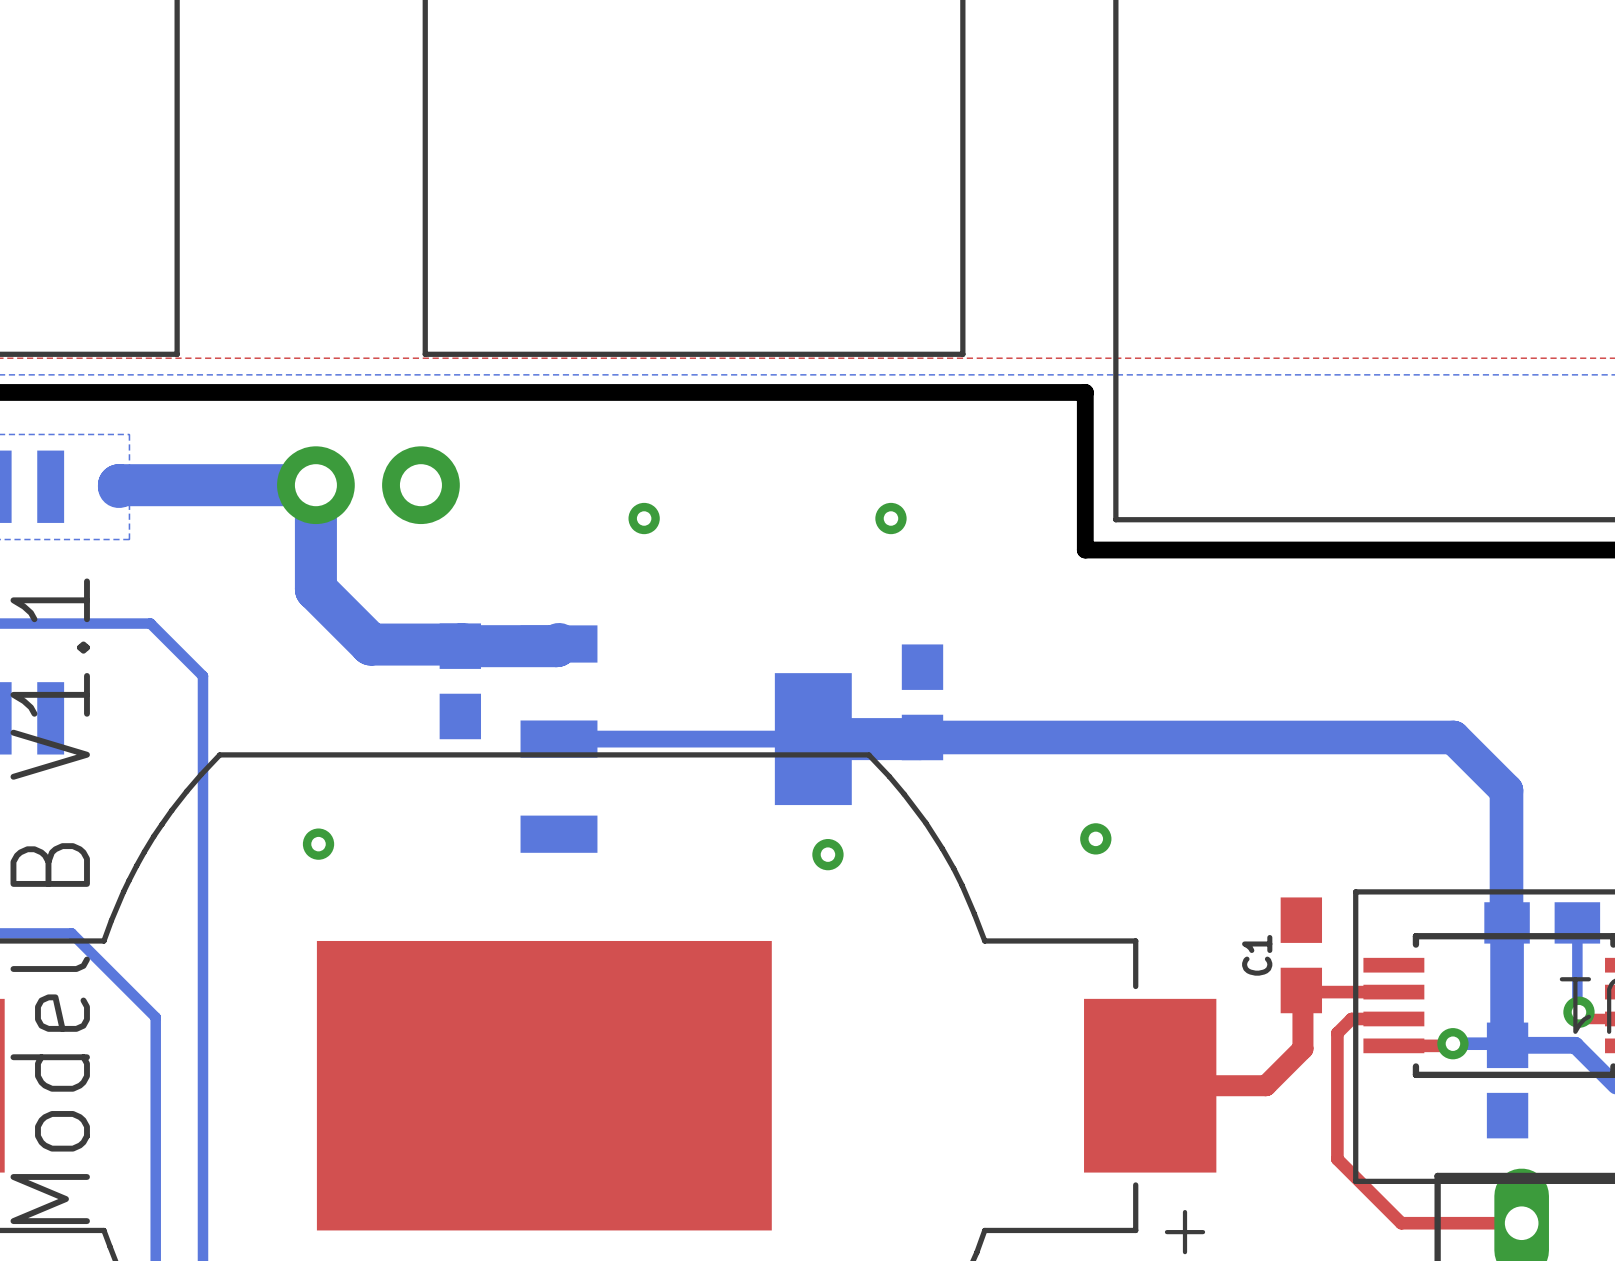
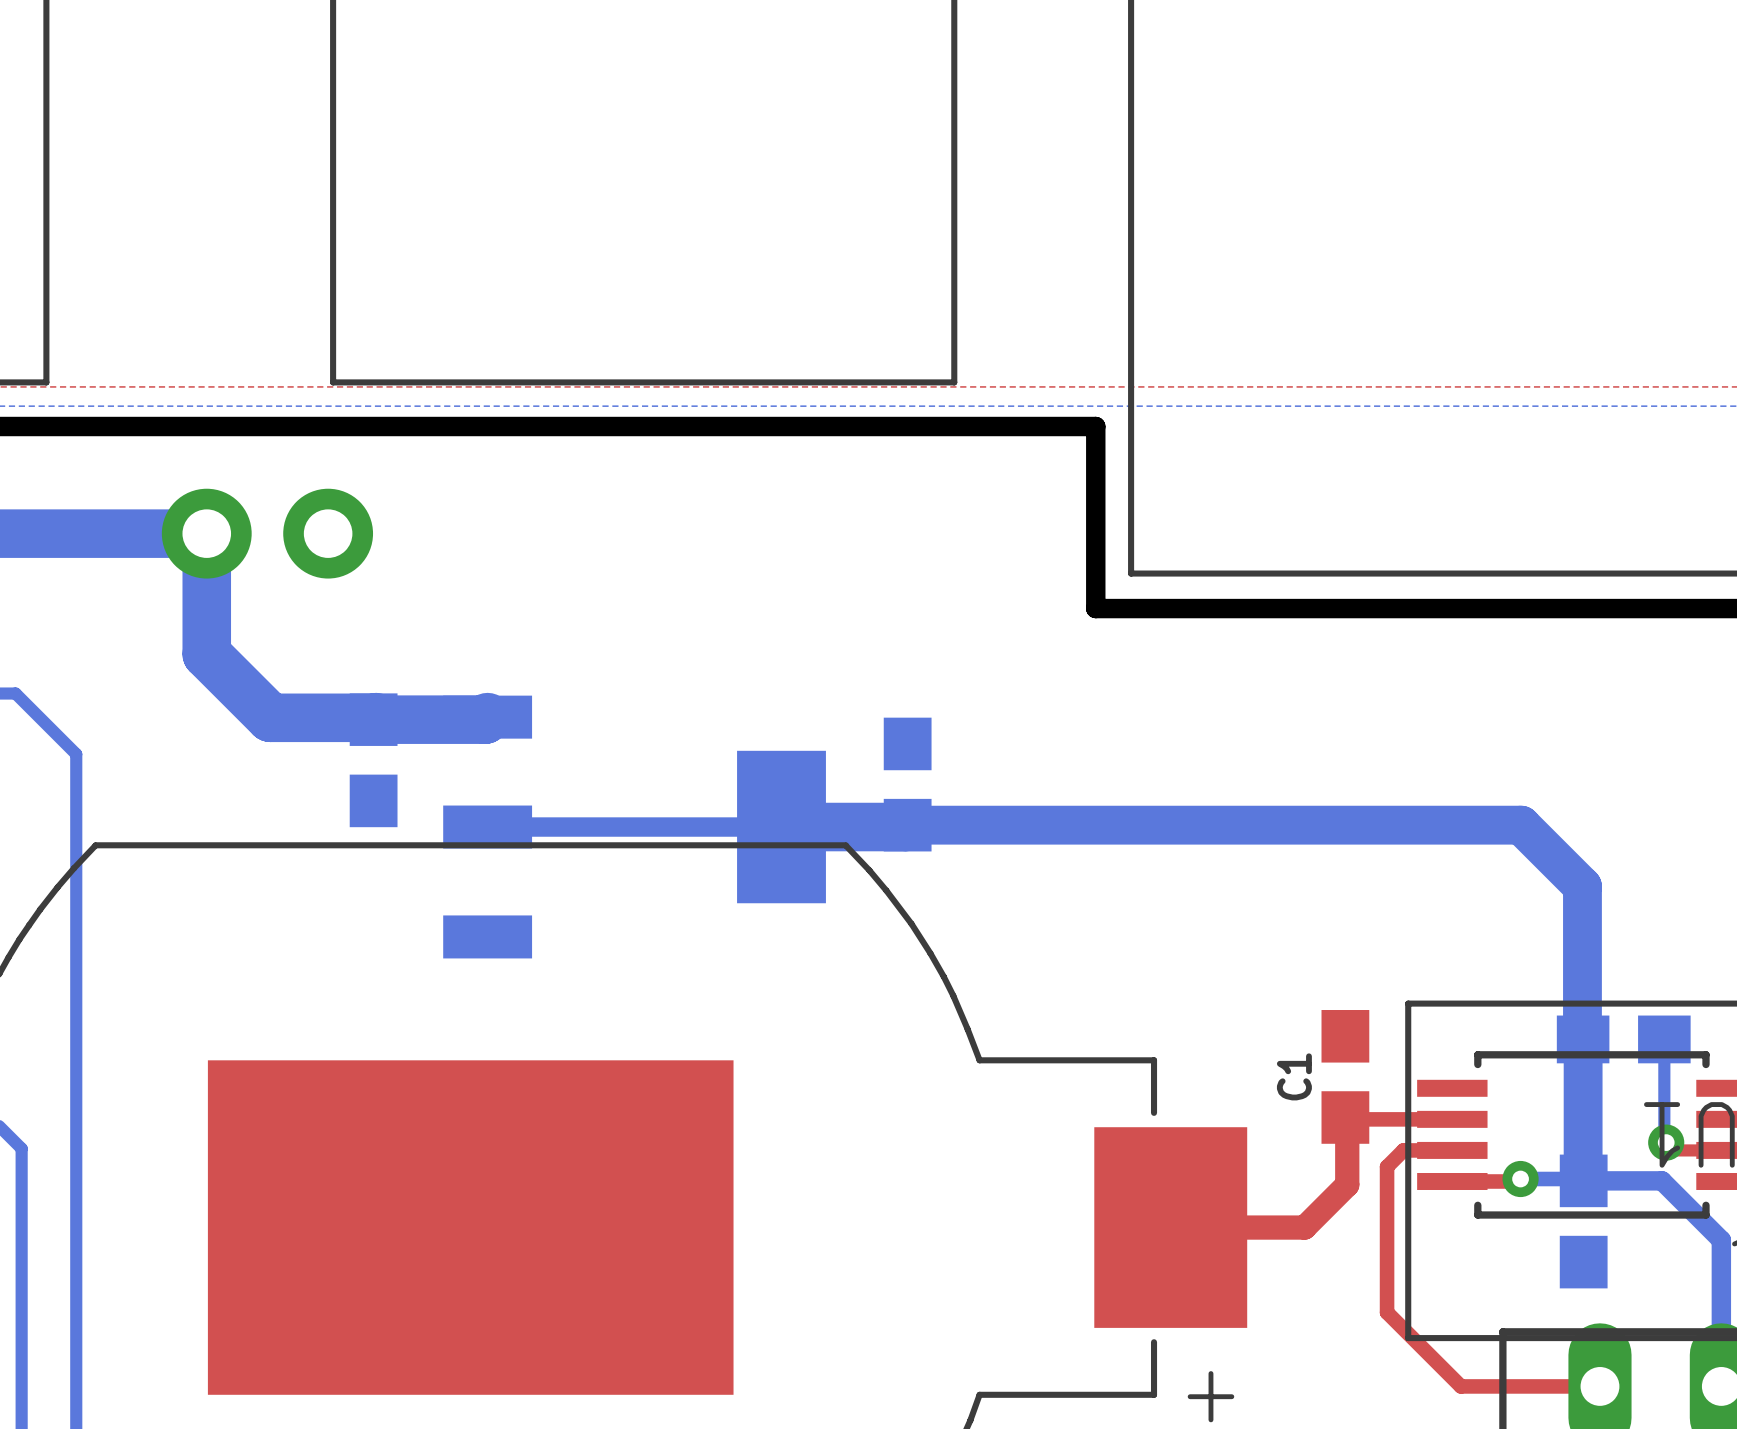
via: (644, 518) -> none
via: (890, 518) -> none
via: (1095, 838) -> none
via: (318, 844) -> none
via: (827, 854) -> none

